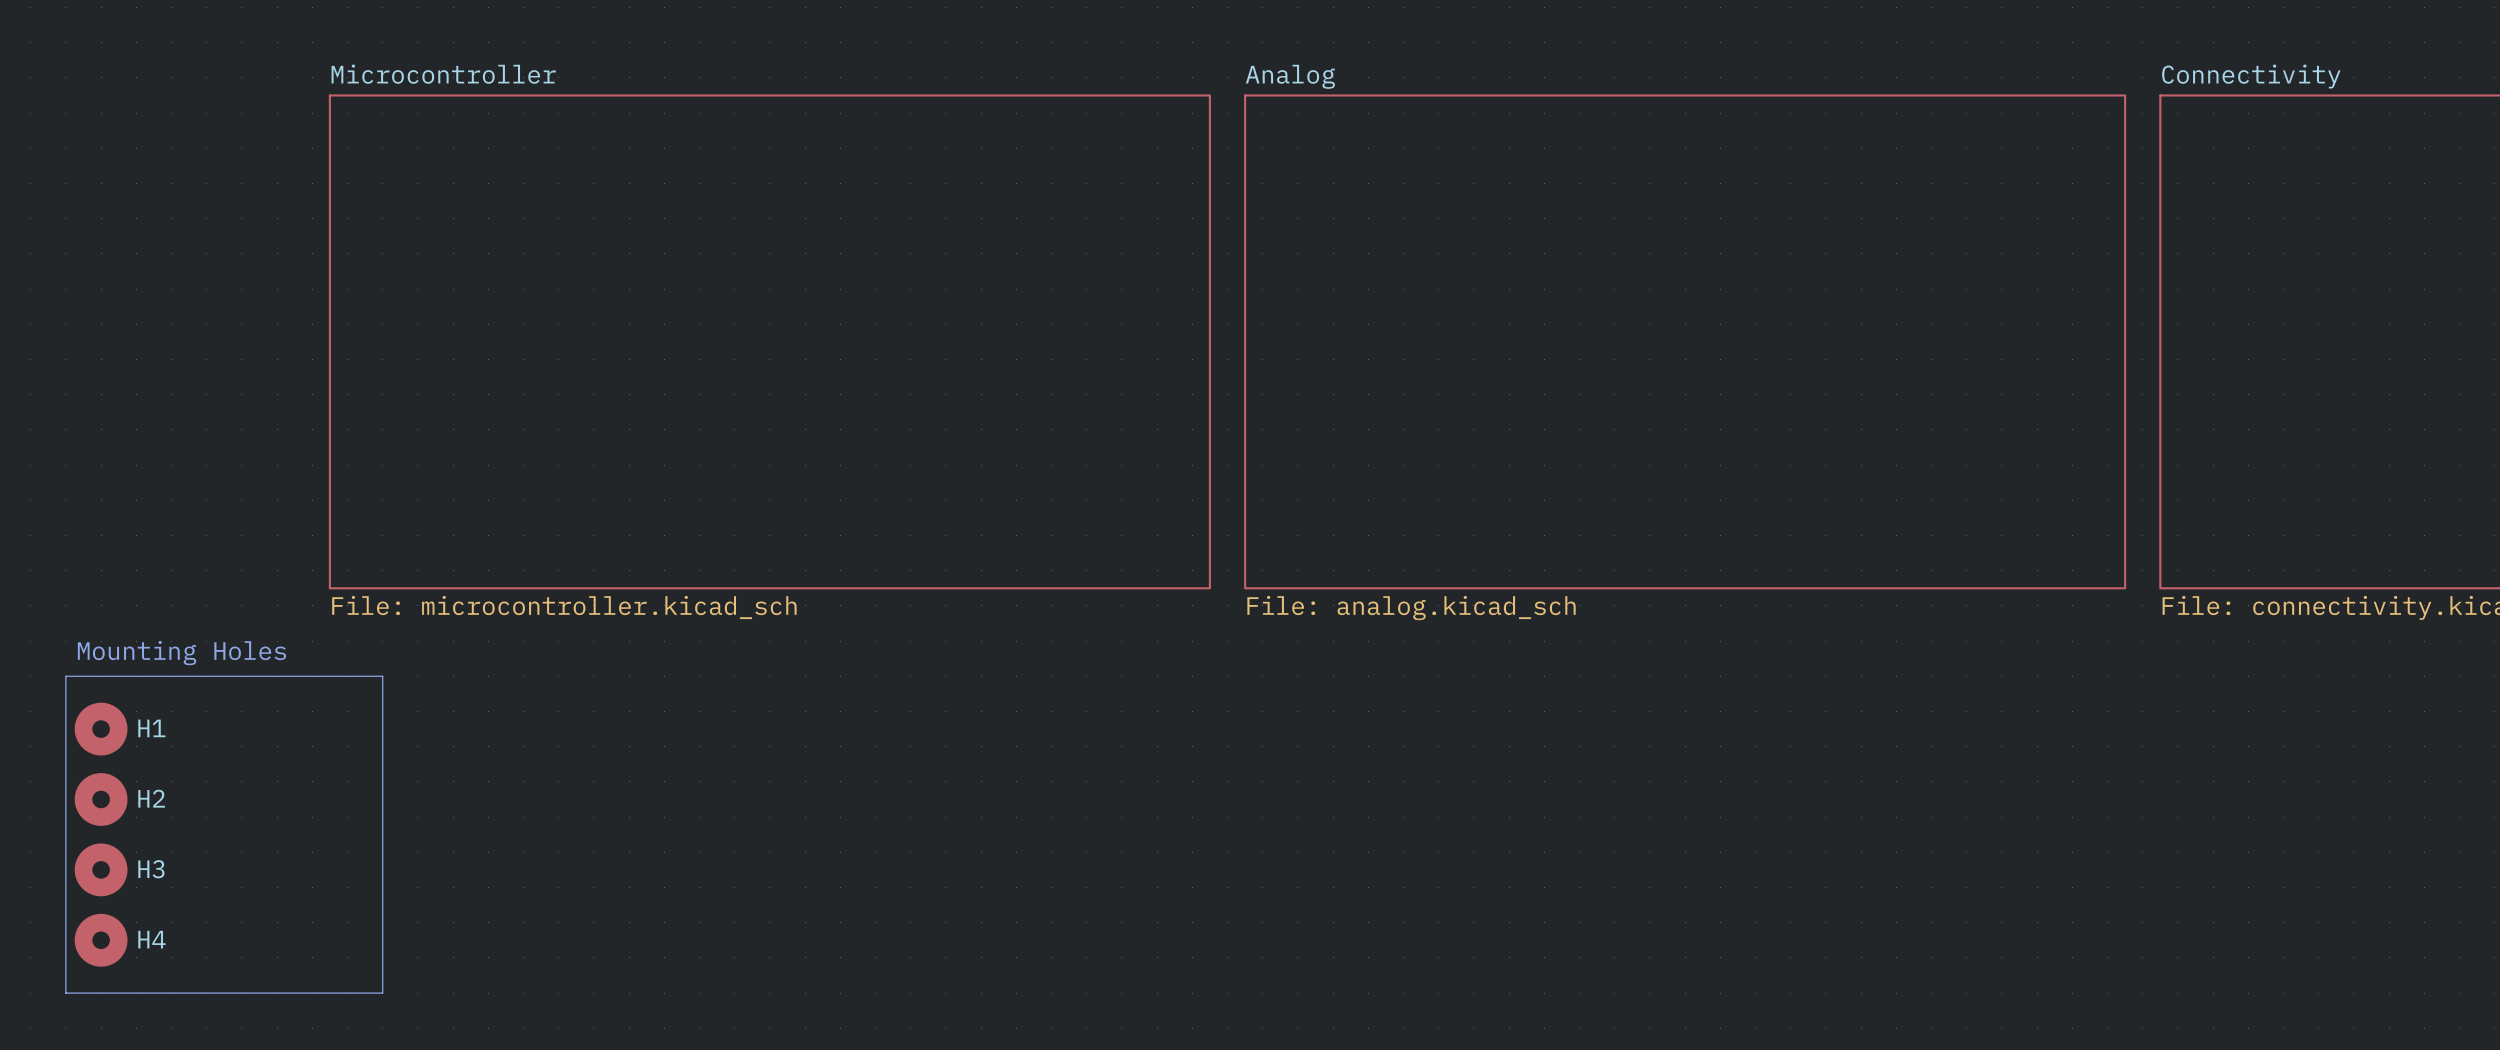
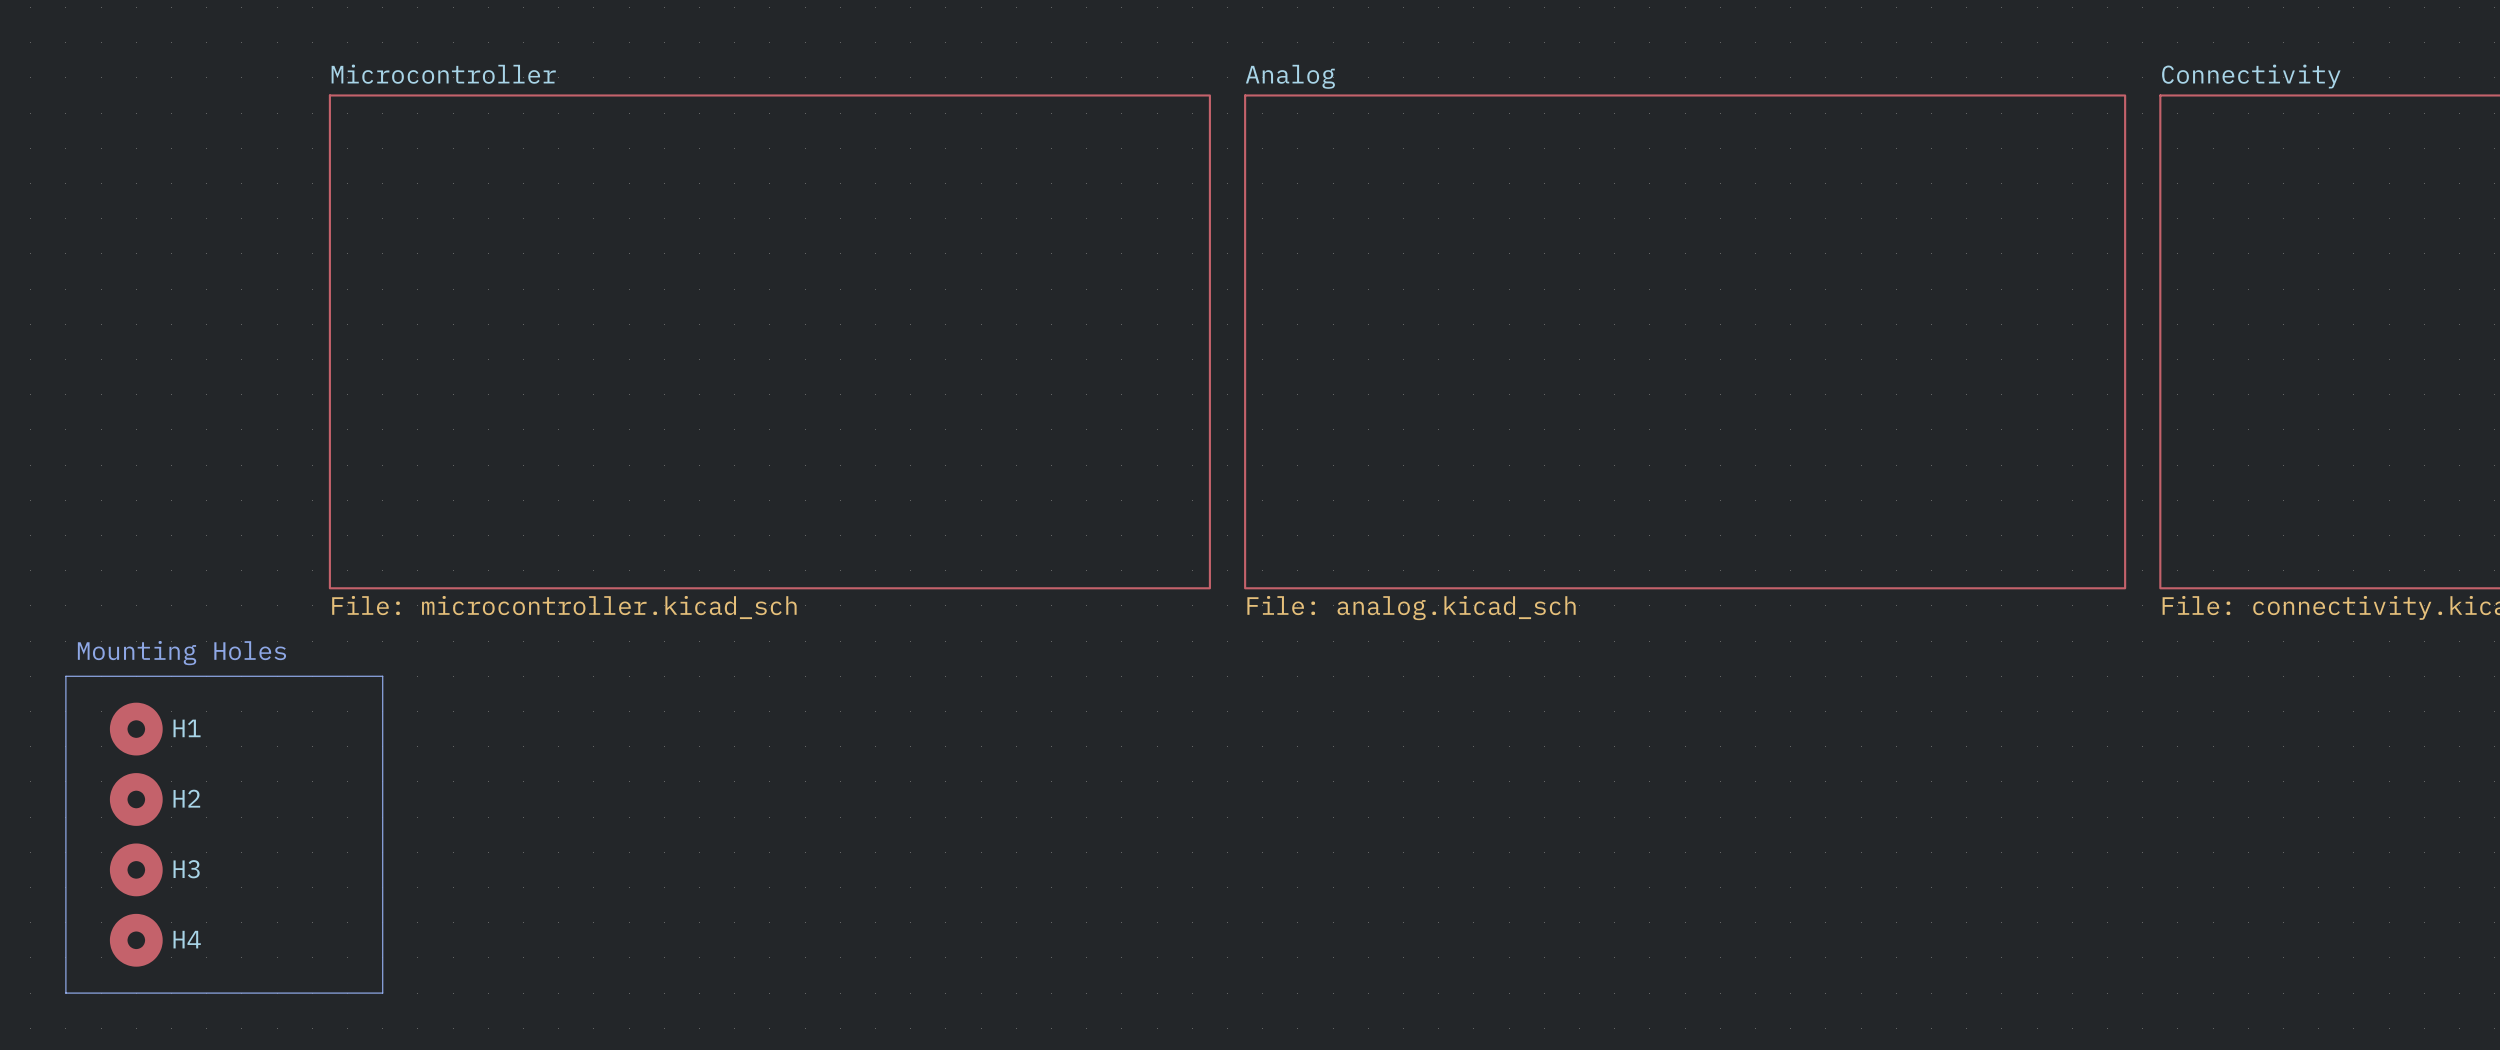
H1 position: (101, 729) -> (136, 729)
H2 position: (101, 799) -> (136, 799)
H3 position: (101, 869) -> (136, 869)
H4 position: (101, 940) -> (136, 940)

